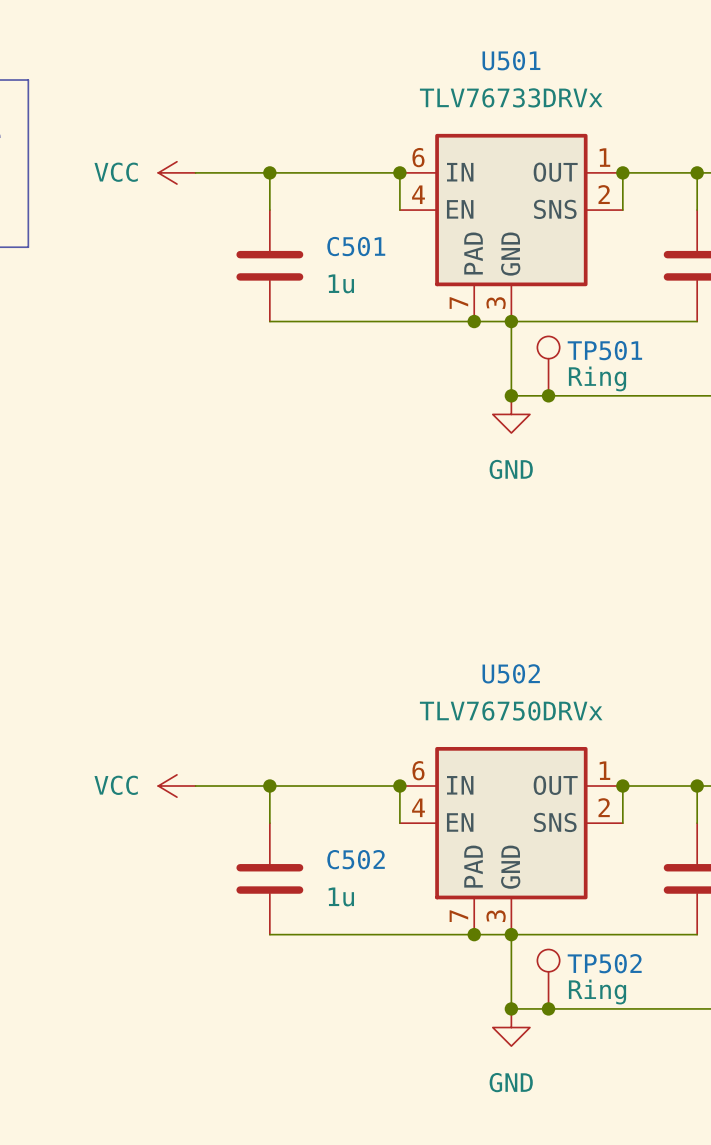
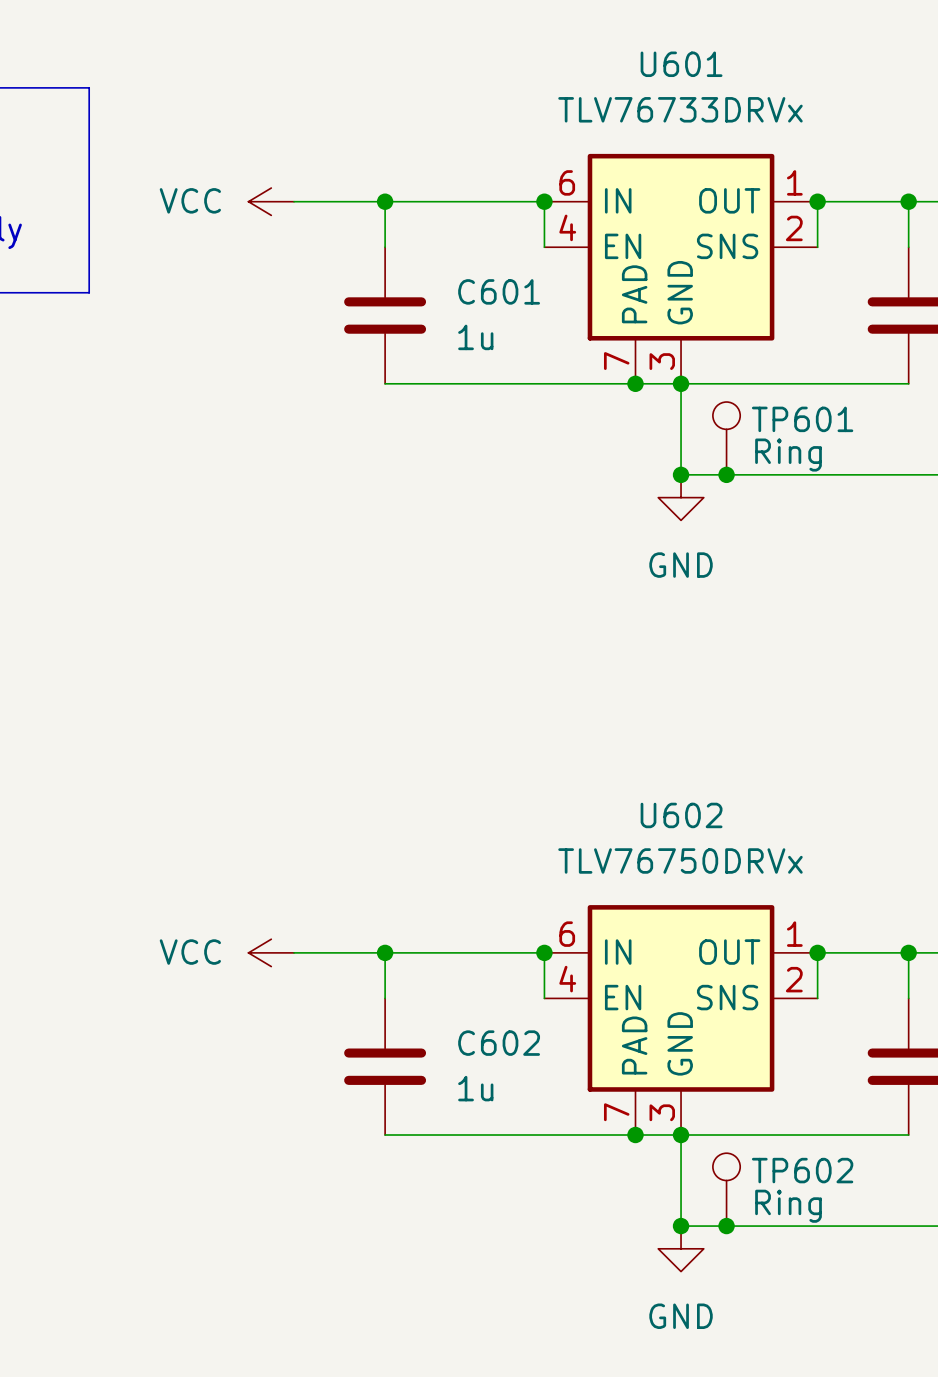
U501 name: U501 (511, 60) -> U601 (681, 64)
C501 name: C501 (356, 246) -> C601 (499, 291)
TP501 name: TP501 (604, 350) -> TP601 (802, 419)
U502 name: U502 (511, 673) -> U602 (681, 815)
C502 name: C502 (356, 859) -> C602 (499, 1043)
TP502 name: TP502 (604, 963) -> TP602 (802, 1170)

